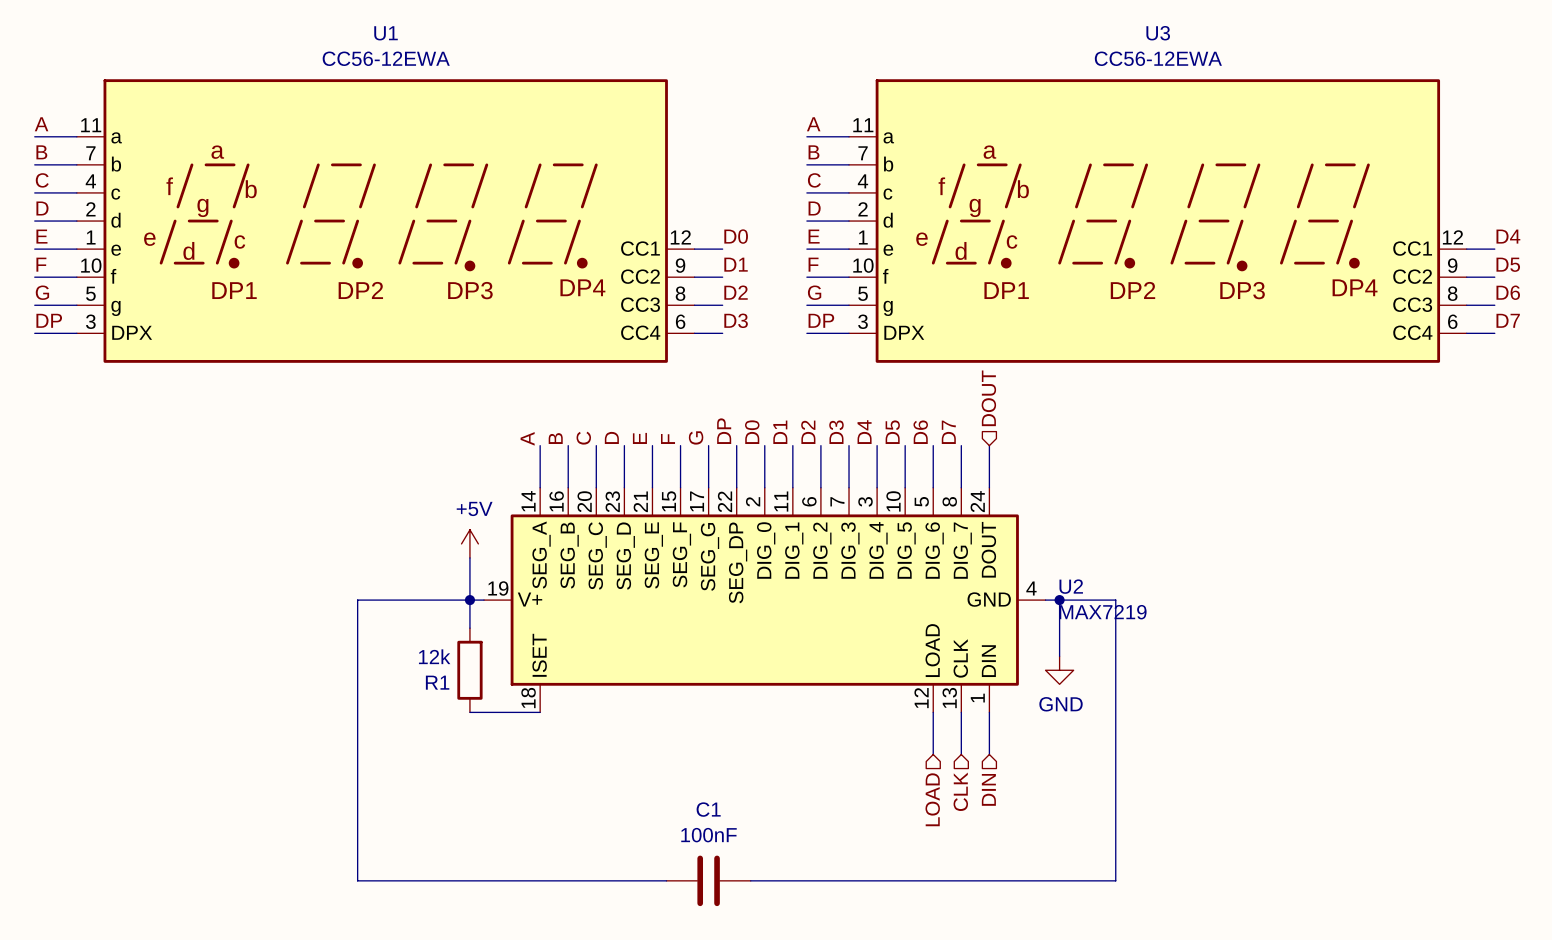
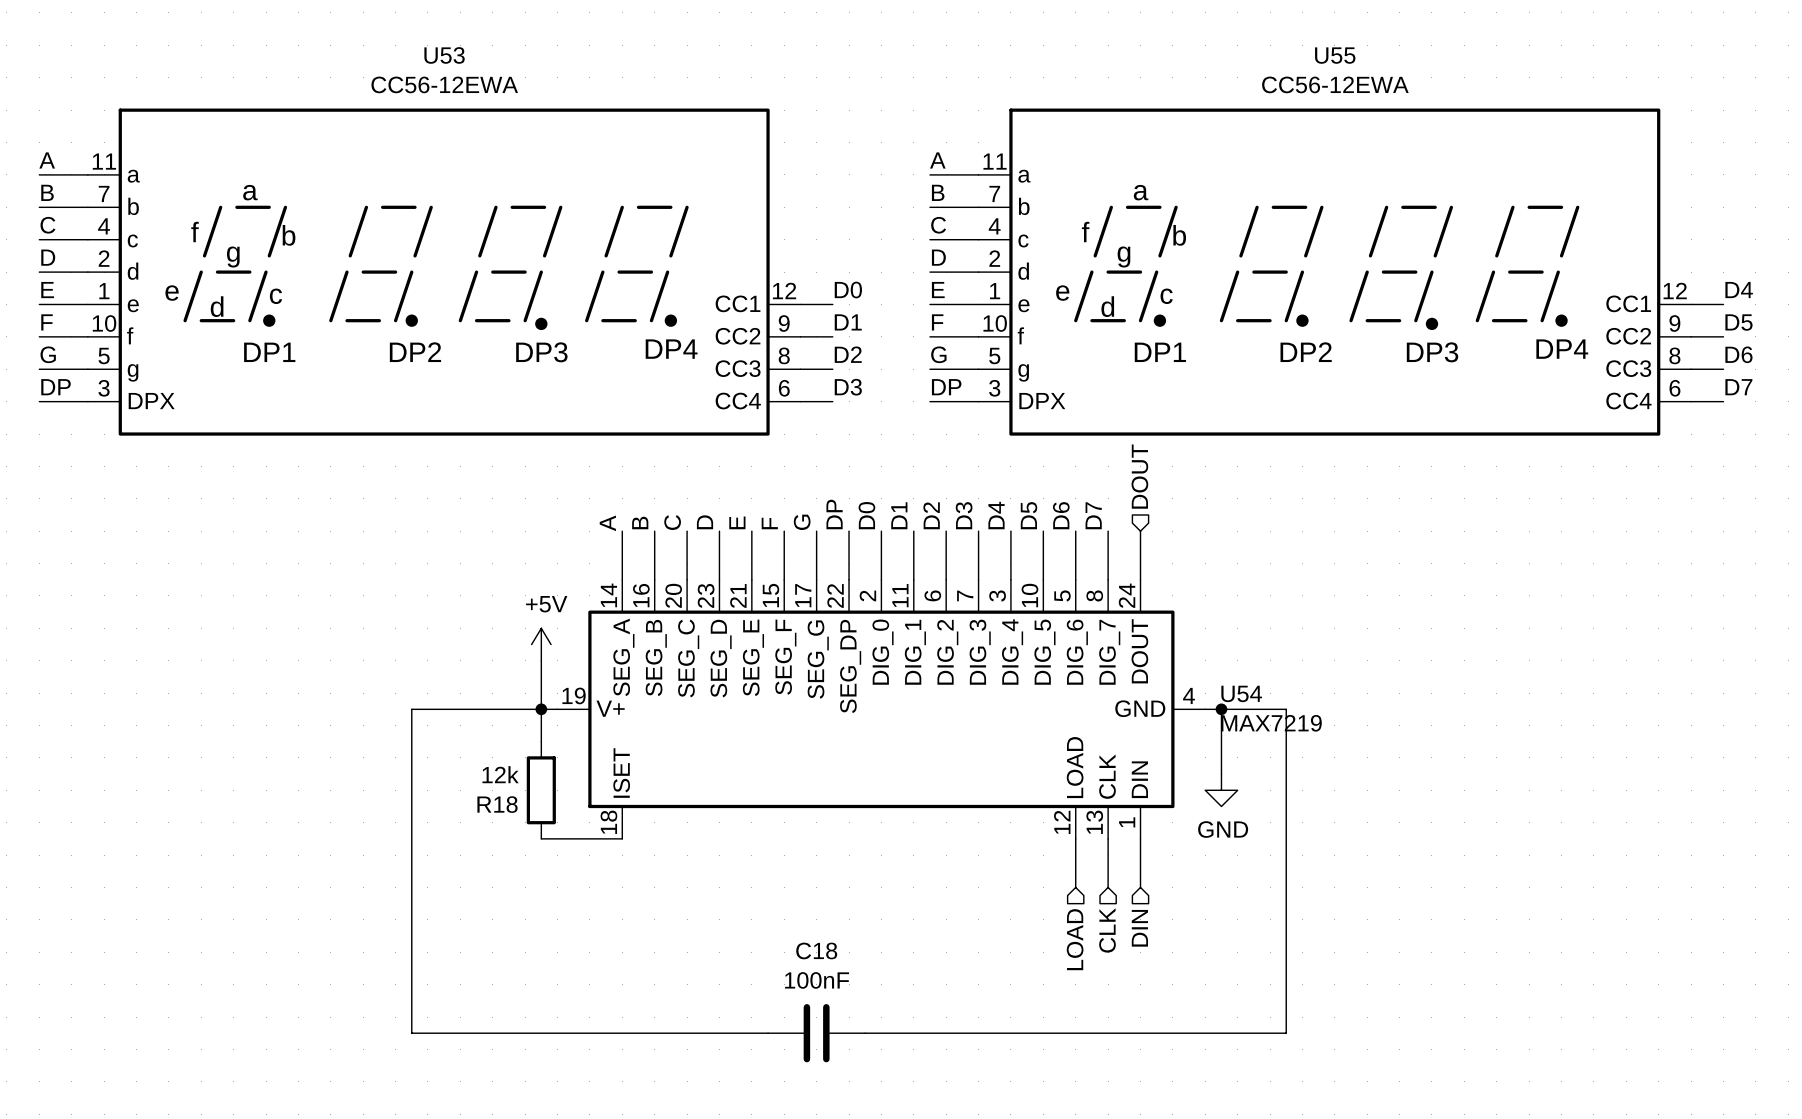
U1 name: U1 (386, 33) -> U53 (444, 55)
U3 name: U3 (1158, 33) -> U55 (1335, 55)
U2 name: U2 (1071, 586) -> U54 (1241, 693)
R1 name: R1 (437, 682) -> R18 (497, 804)
C1 name: C1 (708, 809) -> C18 (816, 950)

